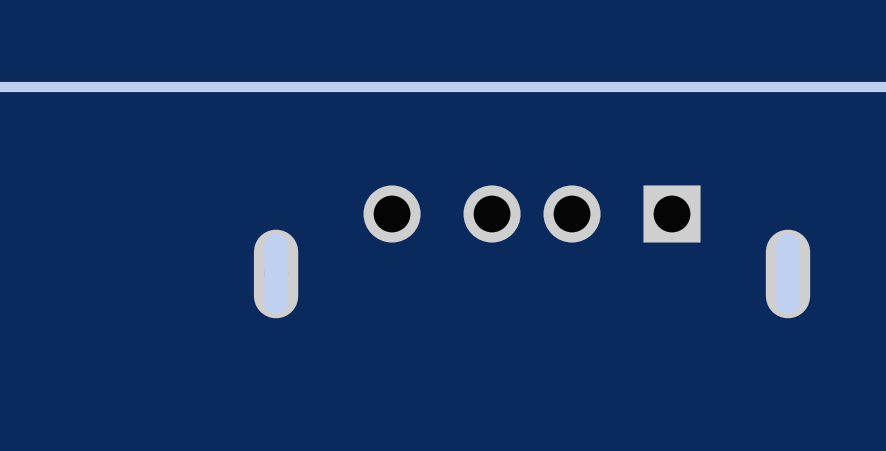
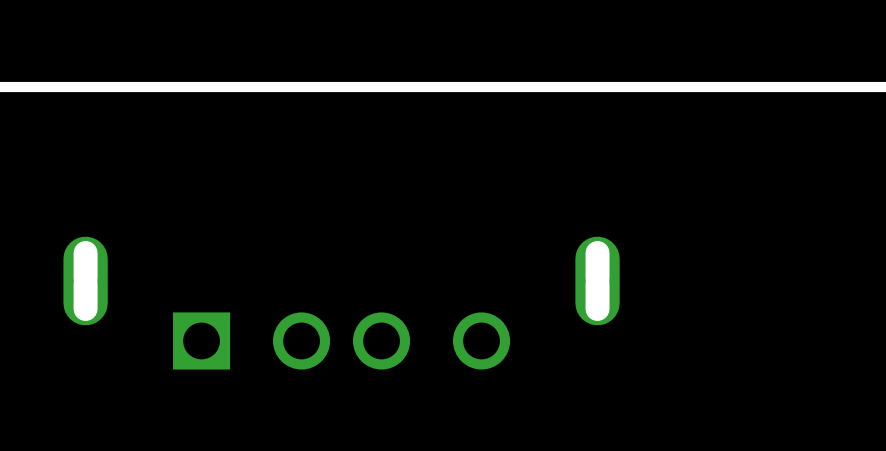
part rotation: 0° (532, 251) -> 180° (341, 303)

